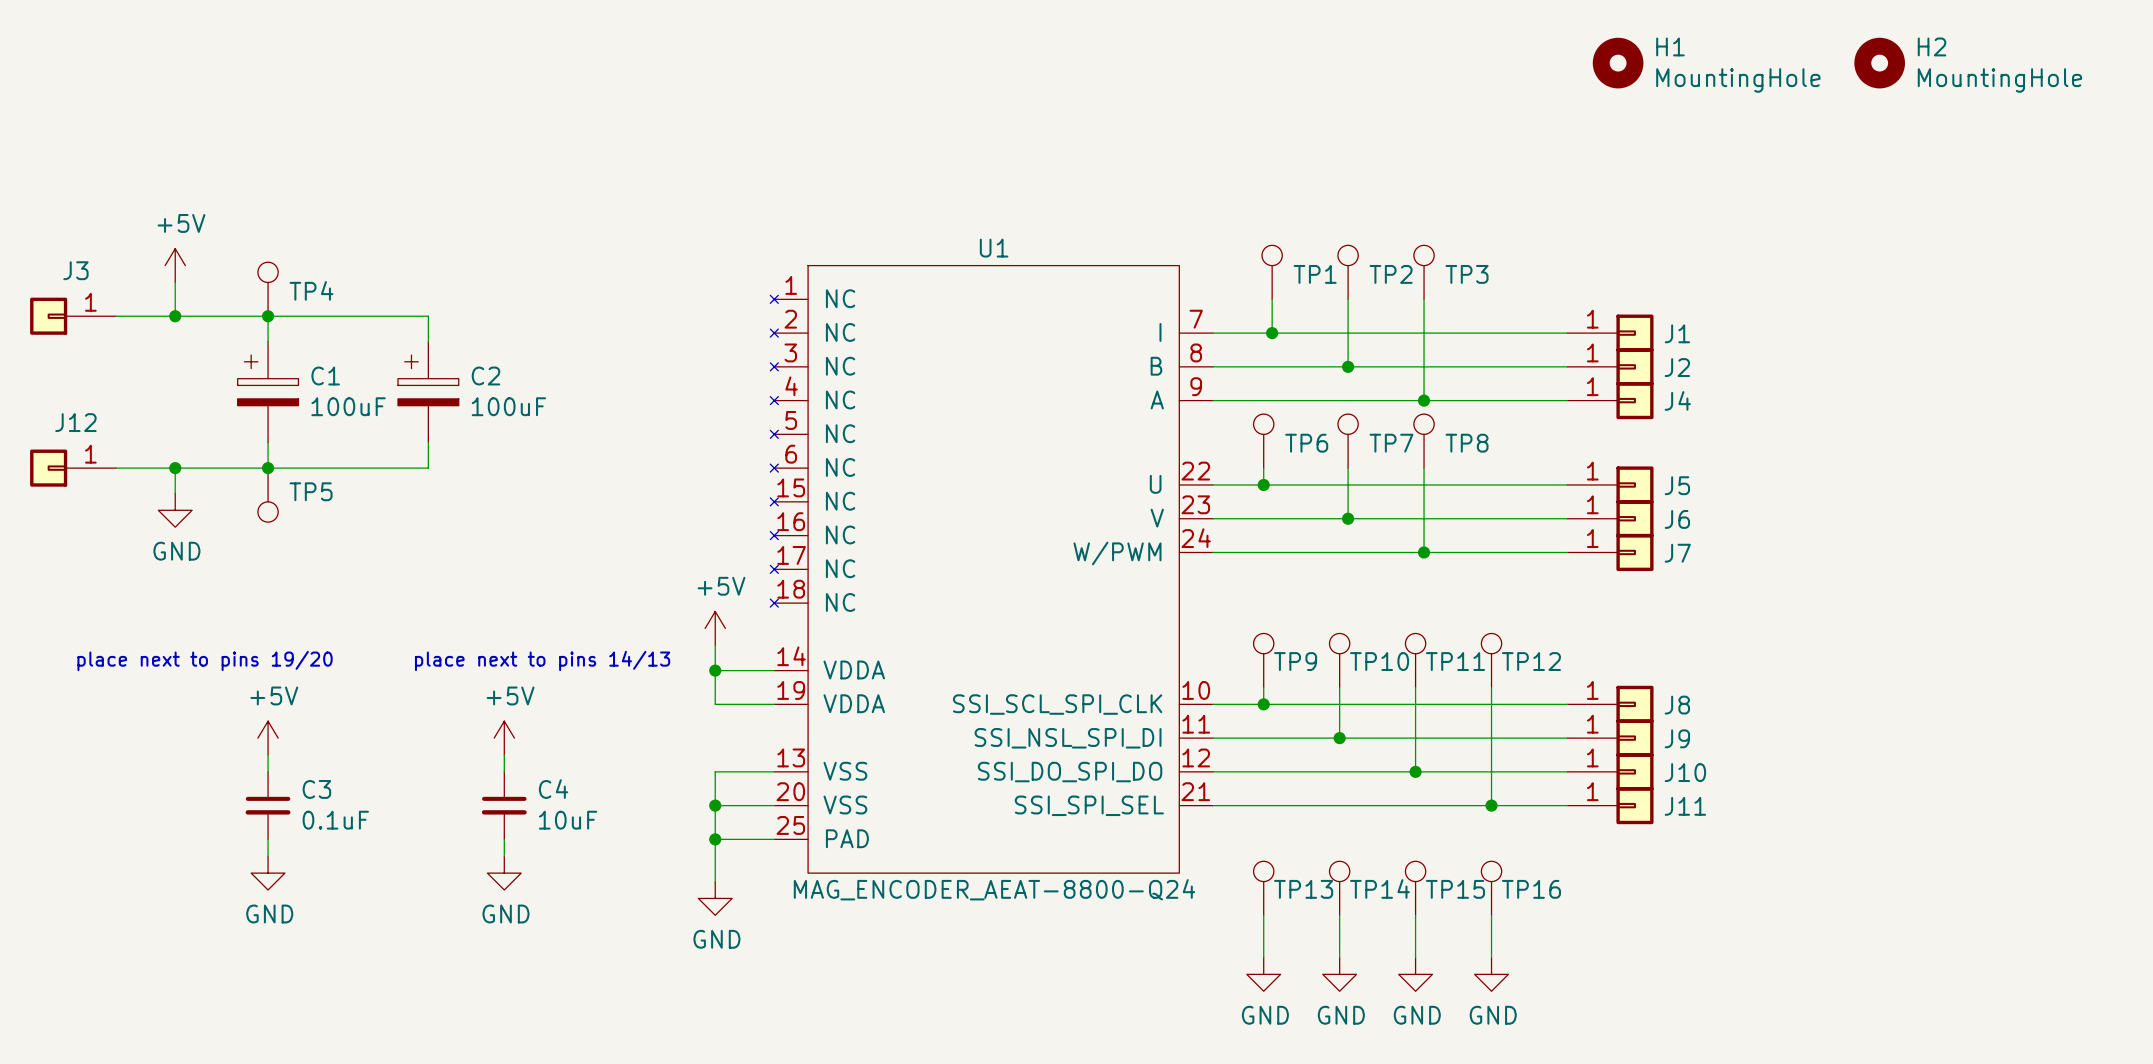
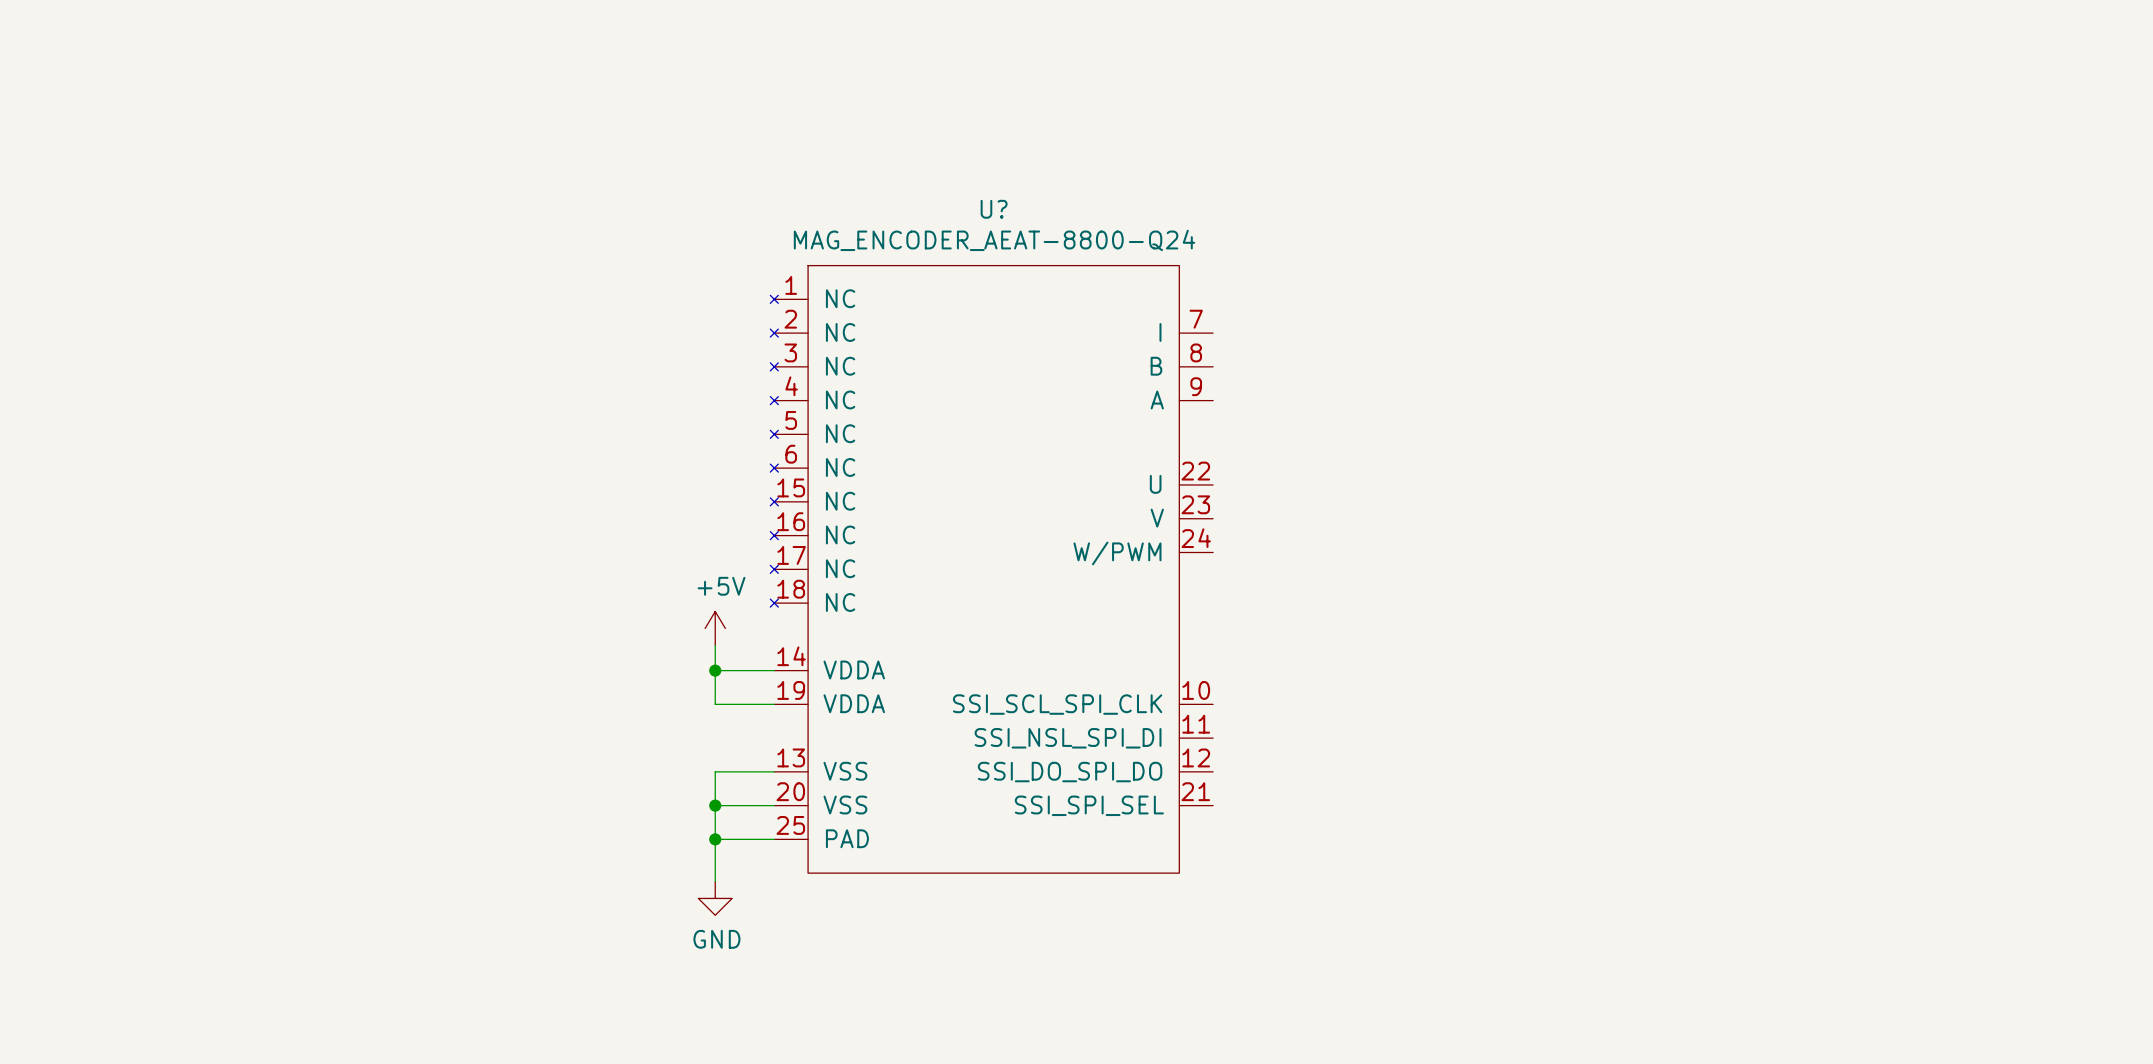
H1: MountingHole (1618, 63) -> none
H2: MountingHole (1879, 63) -> none
U1 name: U1 (994, 248) -> U? (994, 209)
power symbol: +5V (175, 265) -> none
TP1: (1272, 272) -> none
TP2: (1348, 272) -> none
TP3: (1424, 272) -> none
wire: (175, 282) (175, 316) -> none
TP4: (268, 289) -> none
wire: (1272, 299) (1272, 333) -> none
wire: (1348, 299) (1348, 366) -> none
wire: (1424, 299) (1424, 400) -> none
J3: (73, 316) -> none
wire: (116, 316) (428, 316) (428, 341) -> none
junction: (175, 316) -> none
wire: (268, 316) (268, 341) -> none
junction: (268, 316) -> none
wire: (1213, 333) (1567, 333) -> none
junction: (1272, 333) -> none
J1: (1610, 333) -> none
wire: (1213, 366) (1567, 366) -> none
junction: (1348, 366) -> none
J2: (1610, 366) -> none
C1: 100uF (268, 392) -> none
C2: 100uF (428, 392) -> none
wire: (1213, 400) (1567, 400) -> none
junction: (1424, 400) -> none
J4: (1610, 400) -> none
TP6: (1263, 441) -> none
TP7: (1348, 441) -> none
TP8: (1424, 441) -> none
wire: (268, 442) (268, 468) -> none
wire: (428, 442) (428, 468) (116, 468) -> none
J12: (73, 468) -> none
wire: (175, 468) (175, 493) -> none
junction: (175, 468) -> none
junction: (268, 468) -> none
wire: (1263, 468) (1263, 484) -> none
wire: (1348, 468) (1348, 518) -> none
wire: (1424, 468) (1424, 552) -> none
wire: (1213, 484) (1567, 484) -> none
junction: (1263, 484) -> none
J5: (1610, 484) -> none
TP5: (268, 495) -> none
power symbol: GND (175, 510) -> none
wire: (1213, 518) (1567, 518) -> none
junction: (1348, 518) -> none
J6: (1610, 518) -> none
wire: (1213, 552) (1567, 552) -> none
junction: (1424, 552) -> none
J7: (1610, 552) -> none
text: place next to pins 19/20 (205, 660) -> none
text: place next to pins 14/13 (542, 660) -> none
TP9: (1263, 660) -> none
TP10: (1339, 660) -> none
TP11: (1415, 660) -> none
TP12: (1491, 660) -> none
wire: (1263, 687) (1263, 704) -> none
wire: (1339, 687) (1339, 738) -> none
wire: (1415, 687) (1415, 771) -> none
wire: (1491, 687) (1491, 805) -> none
wire: (1213, 704) (1567, 704) -> none
junction: (1263, 704) -> none
J8: (1610, 704) -> none
power symbol: +5V (268, 738) -> none
power symbol: +5V (504, 738) -> none
wire: (1213, 738) (1567, 738) -> none
junction: (1339, 738) -> none
J9: (1610, 738) -> none
wire: (268, 754) (268, 771) -> none
wire: (504, 754) (504, 771) -> none
wire: (1213, 771) (1567, 771) -> none
junction: (1415, 771) -> none
J10: (1610, 771) -> none
C3: 0.1uF (268, 805) -> none
C4: 10uF (504, 805) -> none
wire: (1213, 805) (1567, 805) -> none
junction: (1491, 805) -> none
J11: (1610, 805) -> none
wire: (268, 839) (268, 856) -> none
wire: (504, 839) (504, 856) -> none
power symbol: GND (268, 873) -> none
power symbol: GND (504, 873) -> none
TP13: (1263, 888) -> none
TP14: (1339, 888) -> none
TP15: (1415, 888) -> none
TP16: (1491, 888) -> none
U1 value position: MAG_ENCODER_AEAT-8800-Q24 (994, 889) -> MAG_ENCODER_AEAT-8800-Q24 (994, 240)
wire: (1263, 915) (1263, 957) -> none
wire: (1339, 915) (1339, 957) -> none
wire: (1415, 915) (1415, 957) -> none
wire: (1491, 915) (1491, 957) -> none
power symbol: GND (1263, 974) -> none
power symbol: GND (1339, 974) -> none
power symbol: GND (1415, 974) -> none
power symbol: GND (1491, 974) -> none

